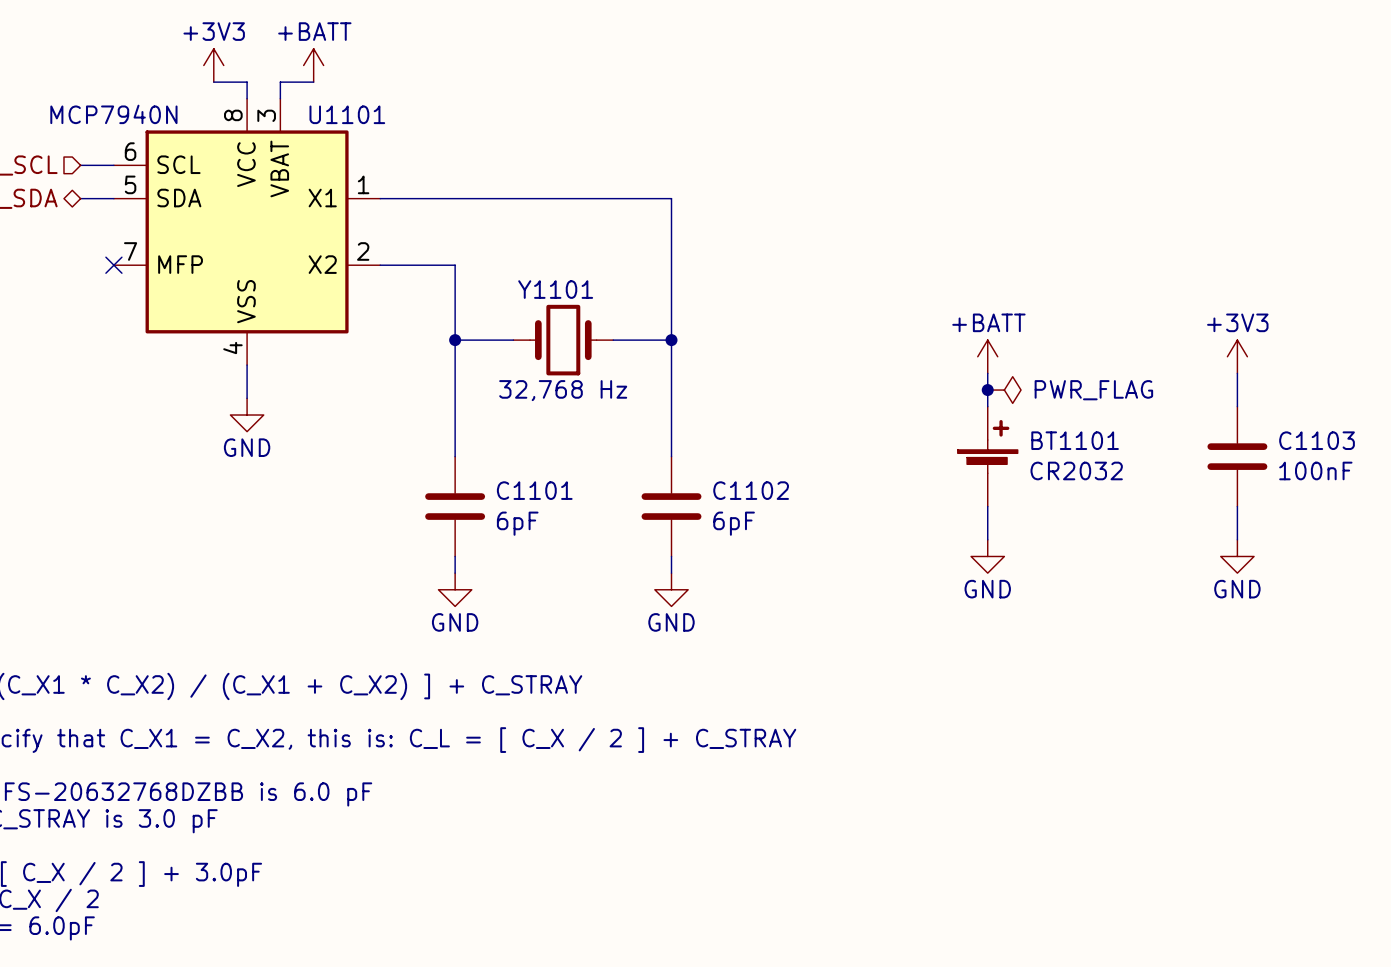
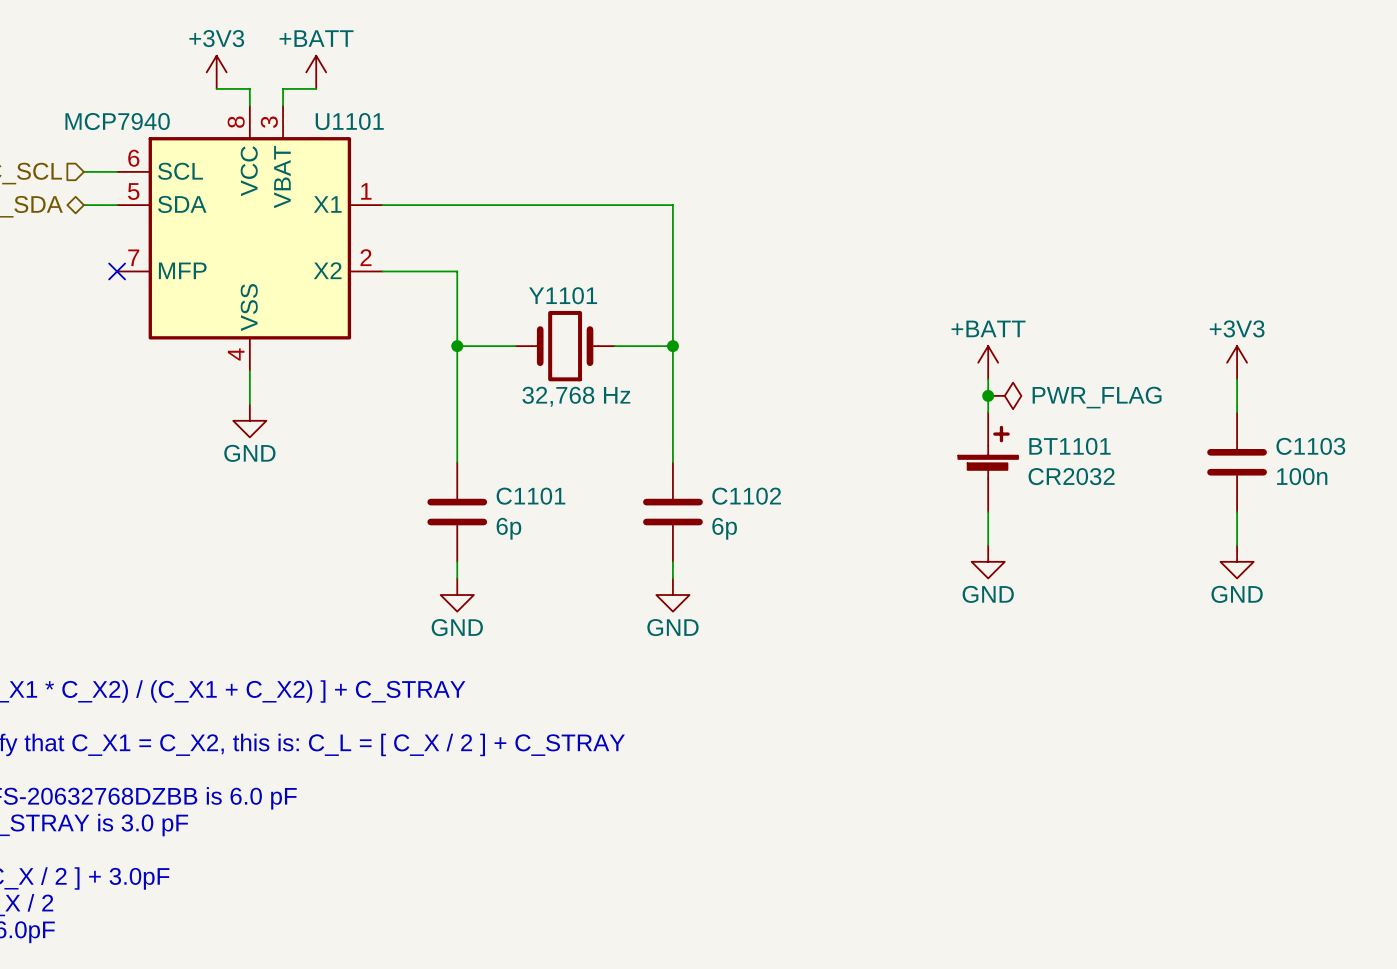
U1101 value: MCP7940N (113, 114) -> MCP7940 (117, 121)
C1103 value: 100nF (1315, 470) -> 100n (1302, 476)
C1101 value: 6pF (517, 523) -> 6p (508, 528)
C1102 value: 6pF (734, 523) -> 6p (724, 528)

